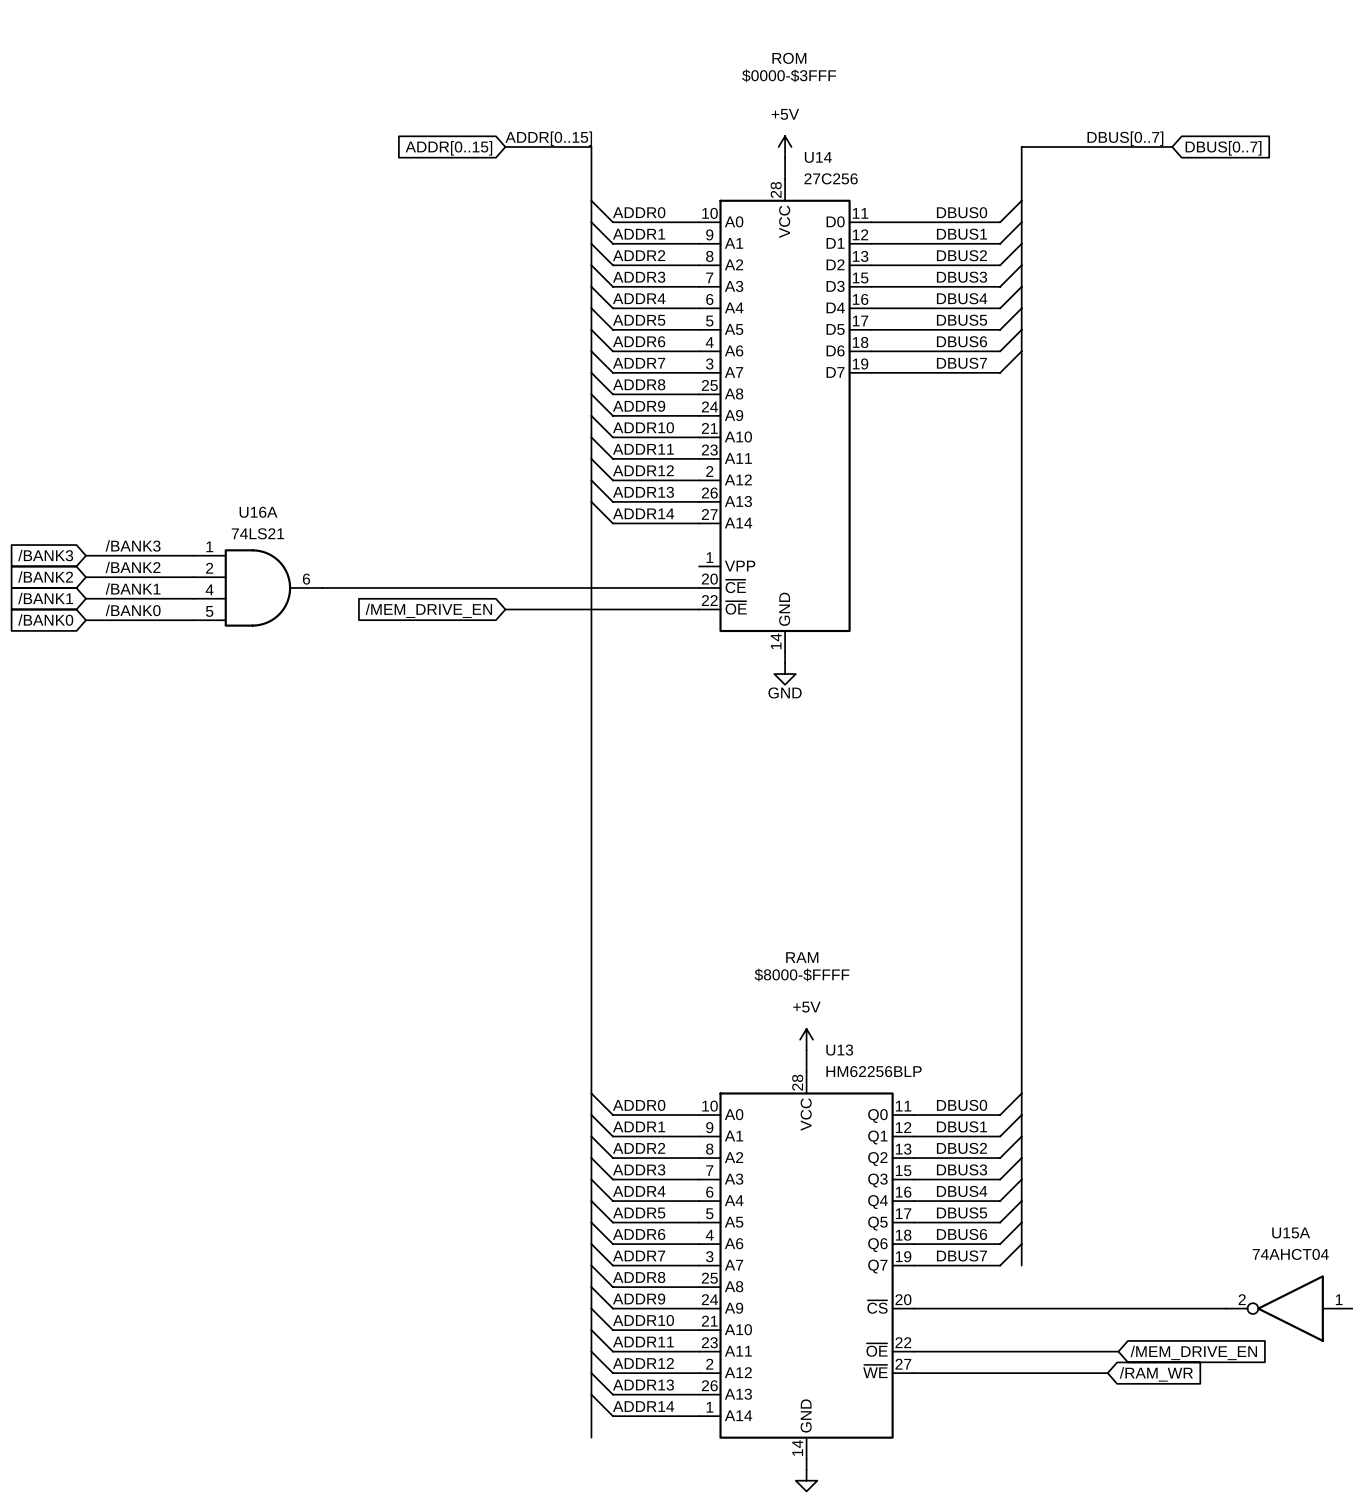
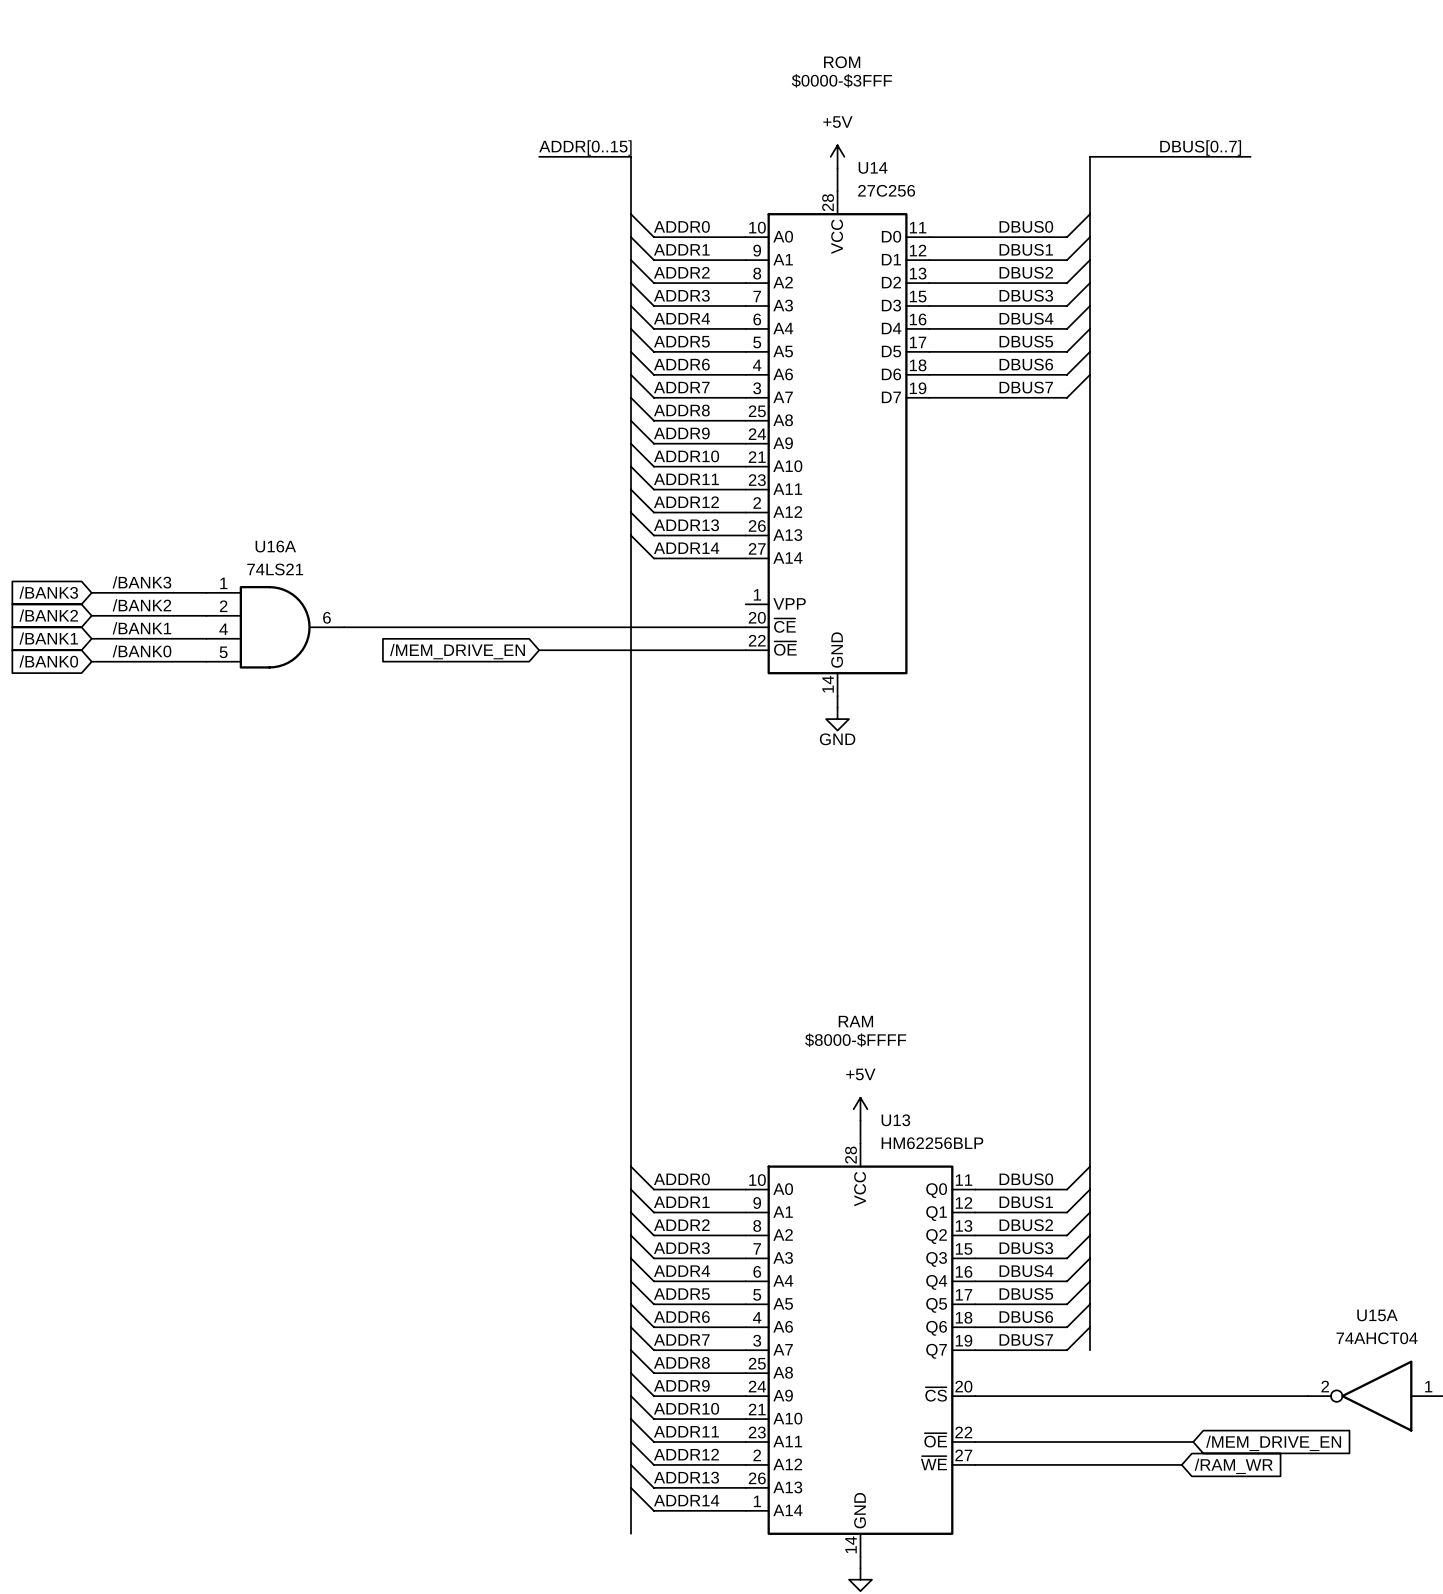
global label: ADDR[0..15] (448, 148) -> none
global label: DBUS[0..7] (1223, 148) -> none

